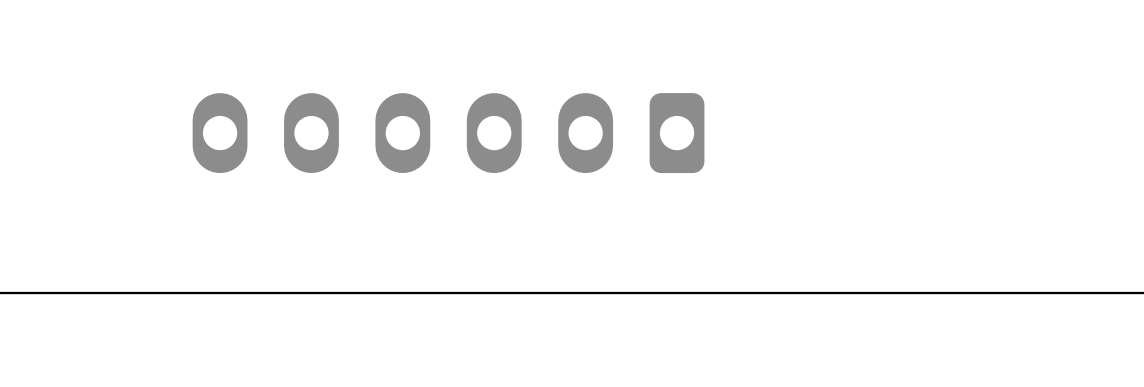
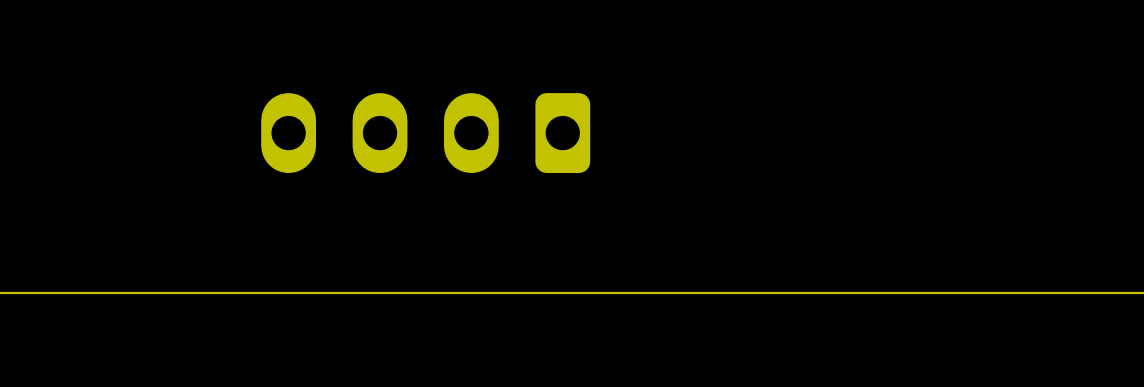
part footprint: [192, 93, 705, 174] -> [261, 93, 591, 174]

